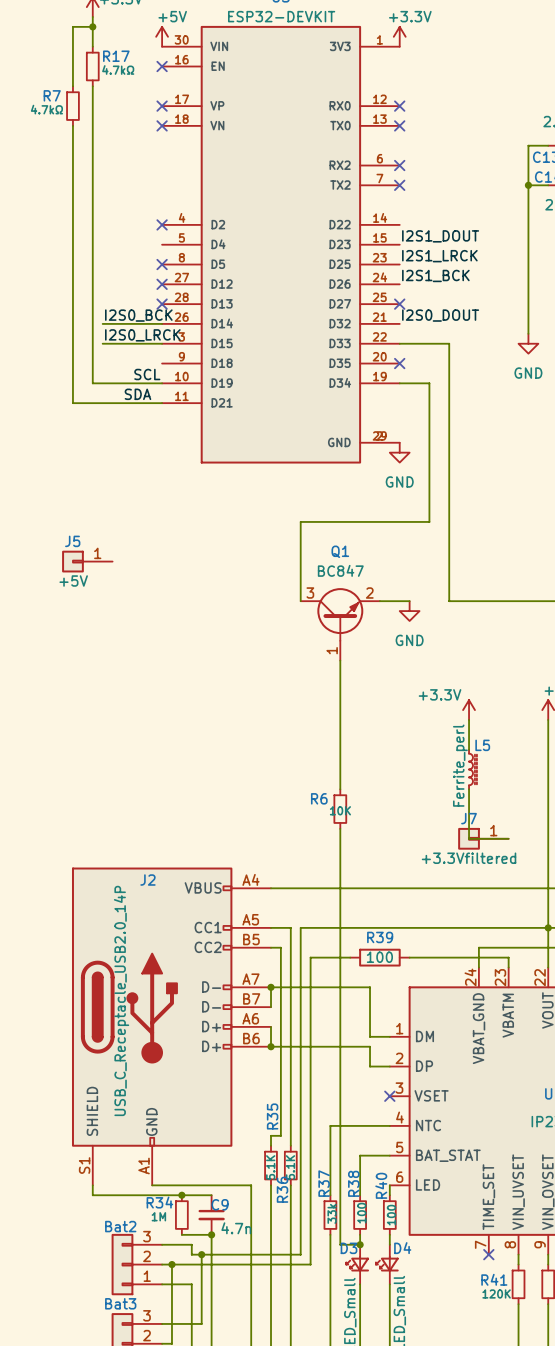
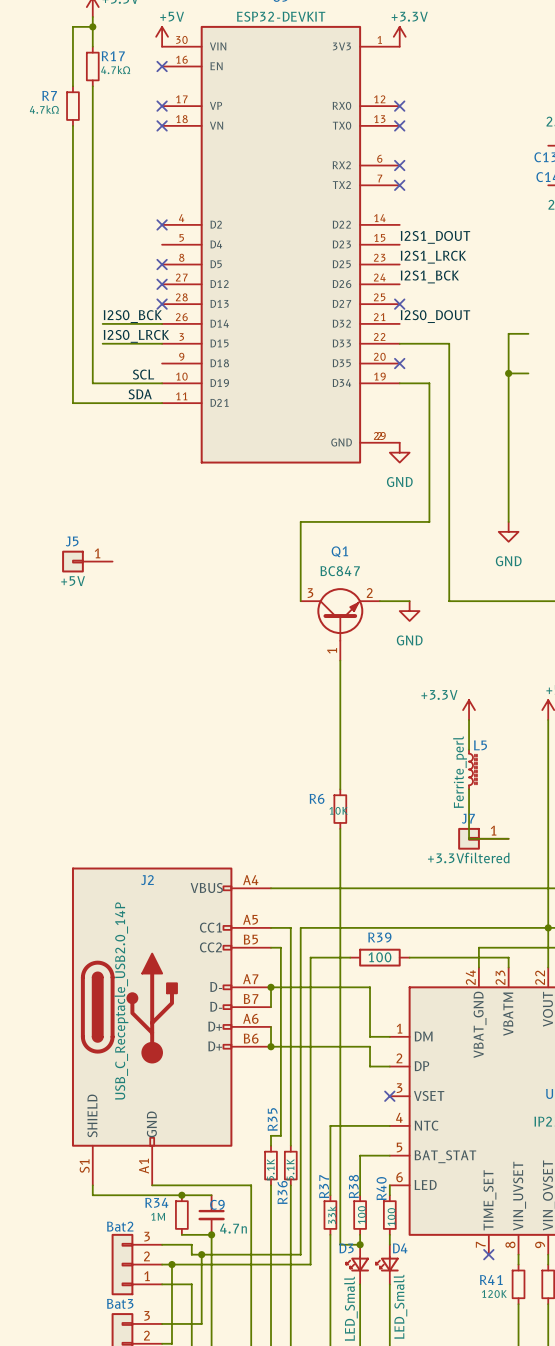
wire: (548, 145) (528, 145) (528, 333) -> (508, 521) (508, 333) (528, 333)
wire: (528, 185) (548, 185) -> (508, 373) (528, 373)
junction: (528, 185) -> none
power symbol position: GND (528, 343) -> GND (508, 531)
junction: none -> (508, 373)

